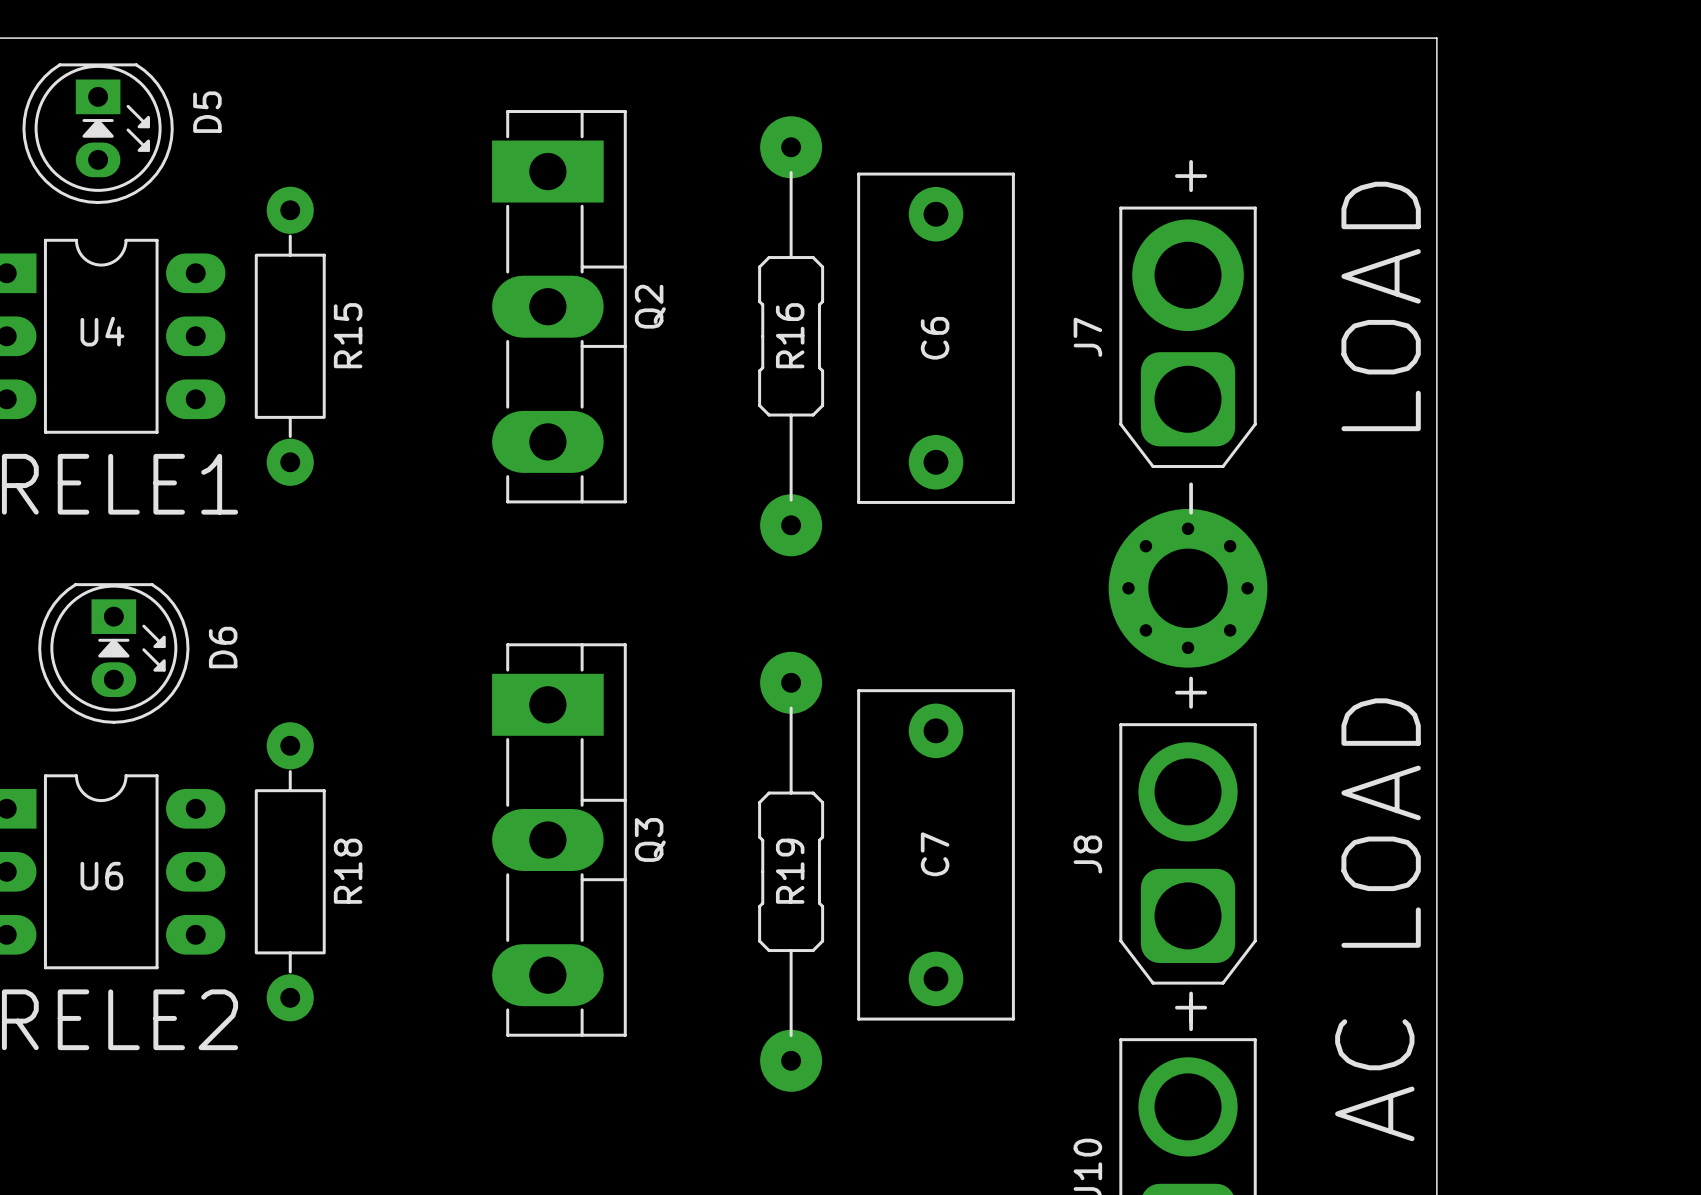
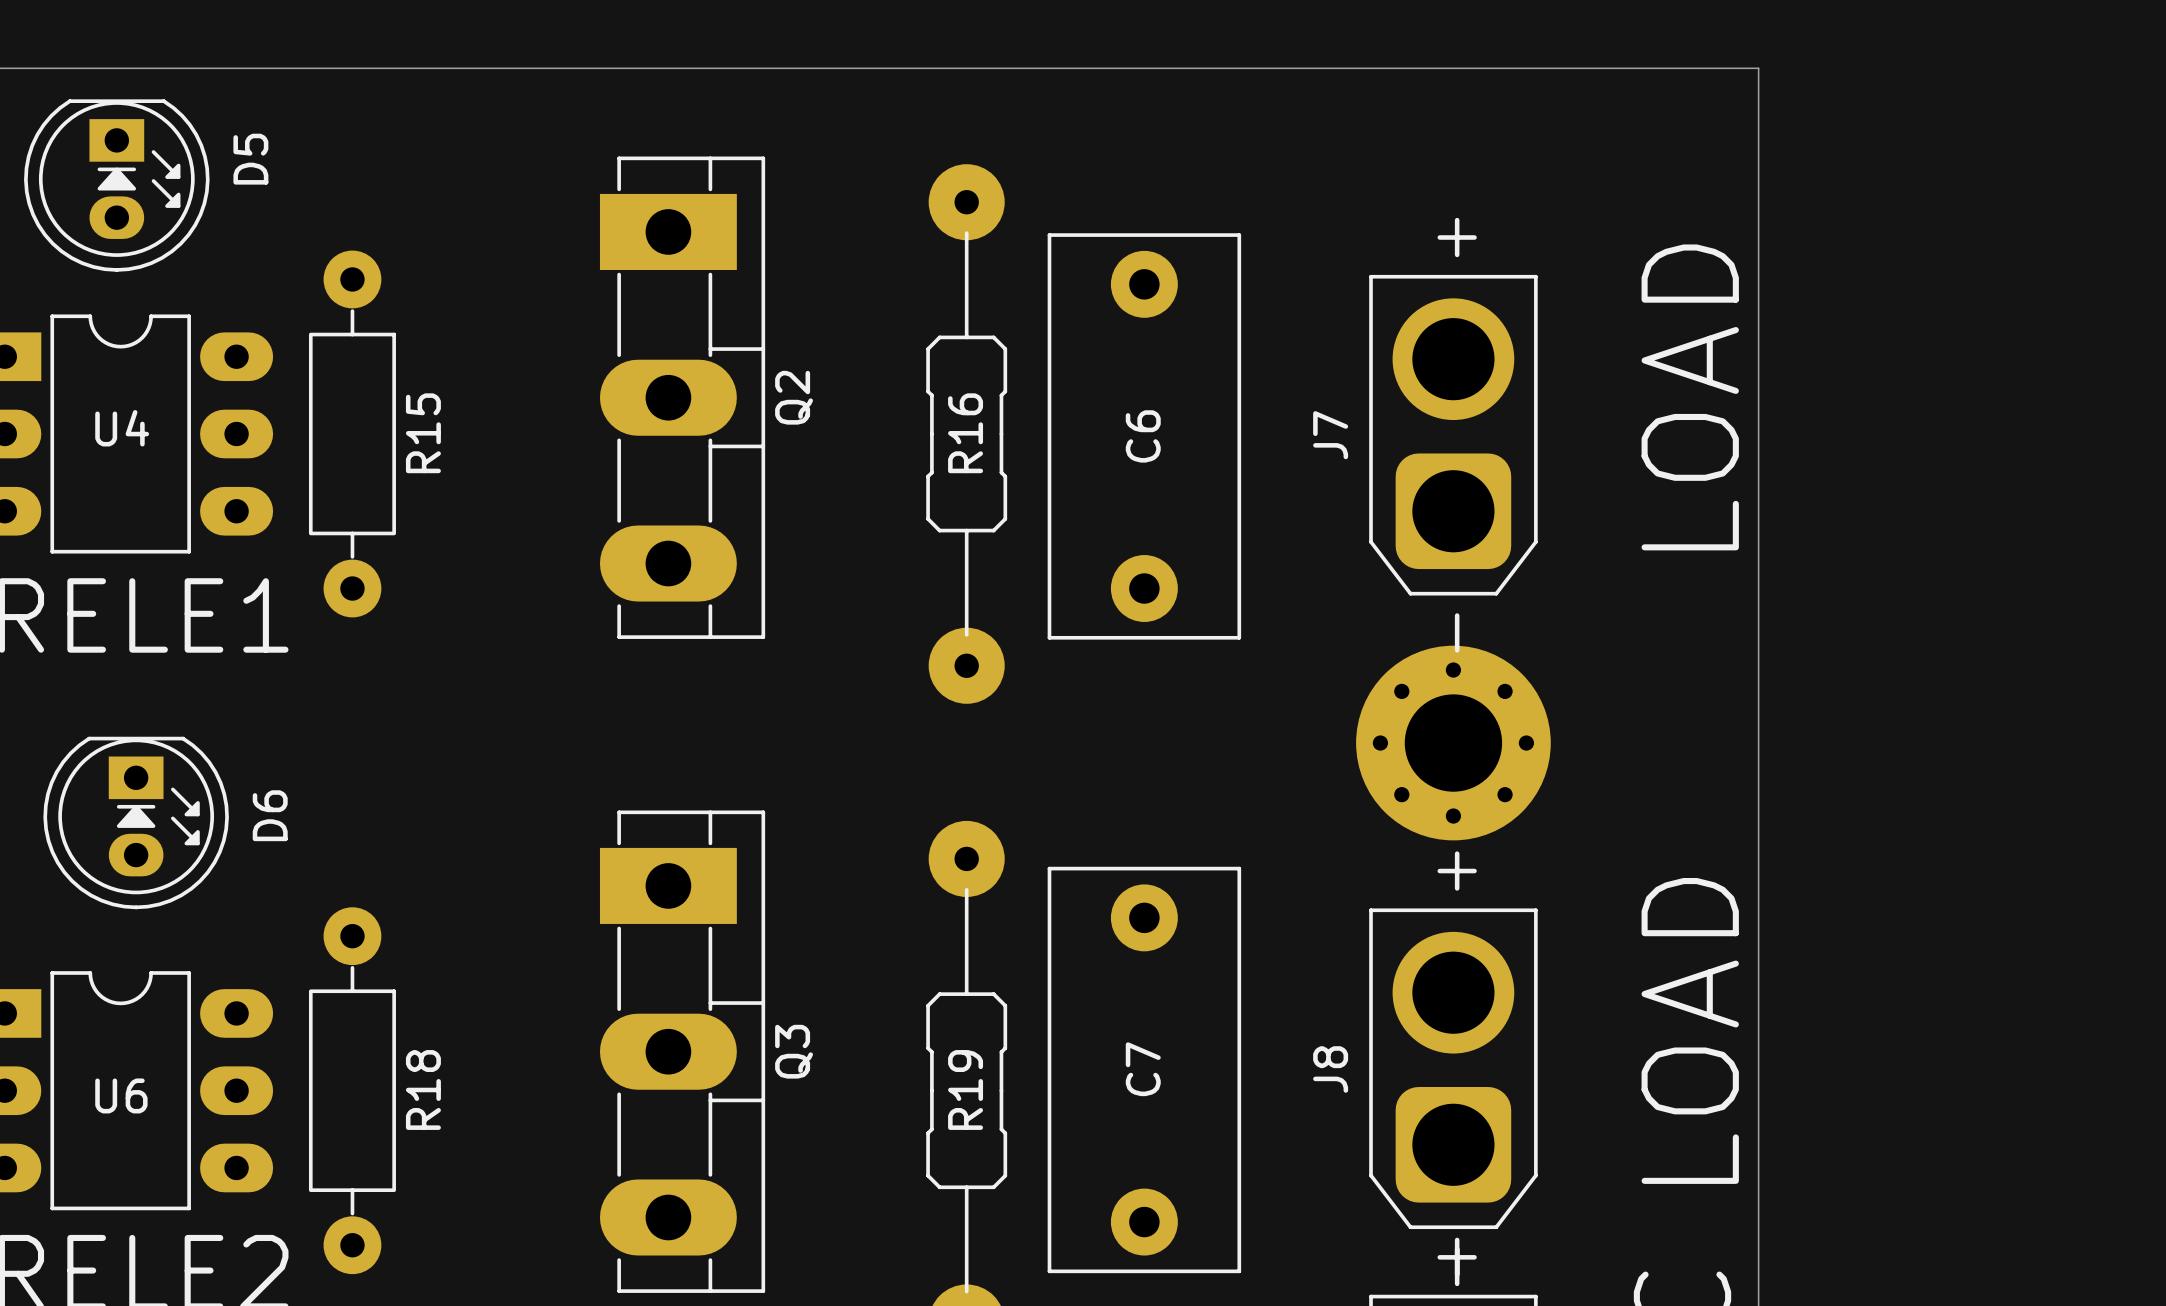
J7 footprint: [1119, 206, 1257, 468] -> [1369, 274, 1538, 596]

